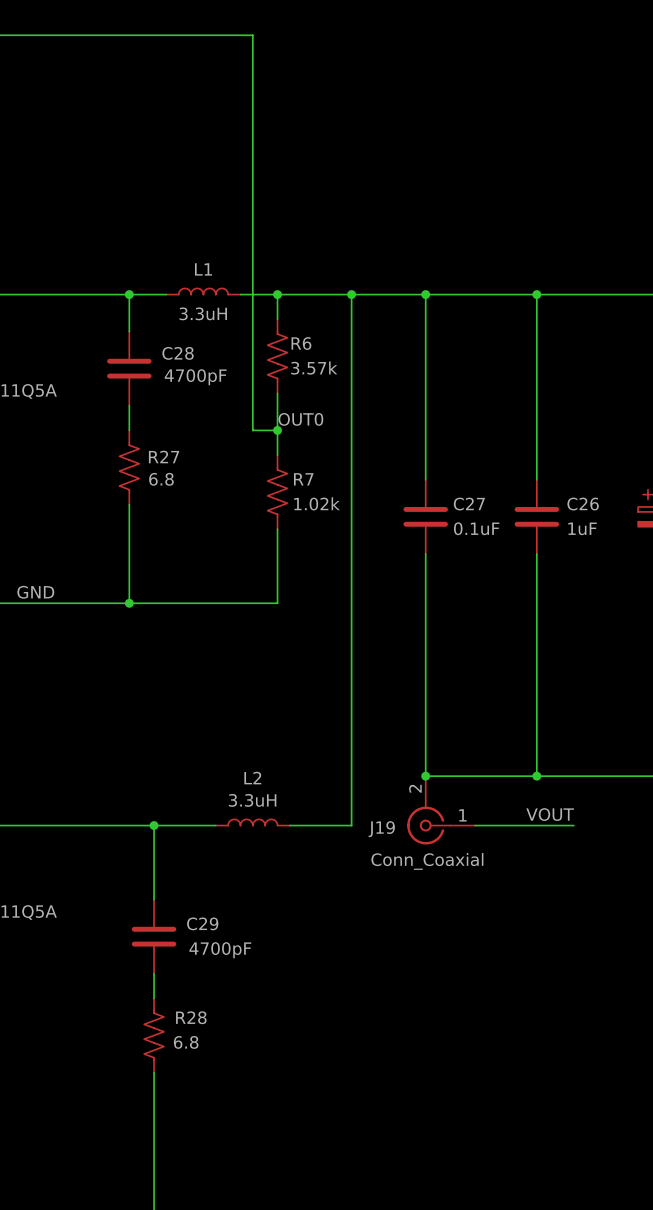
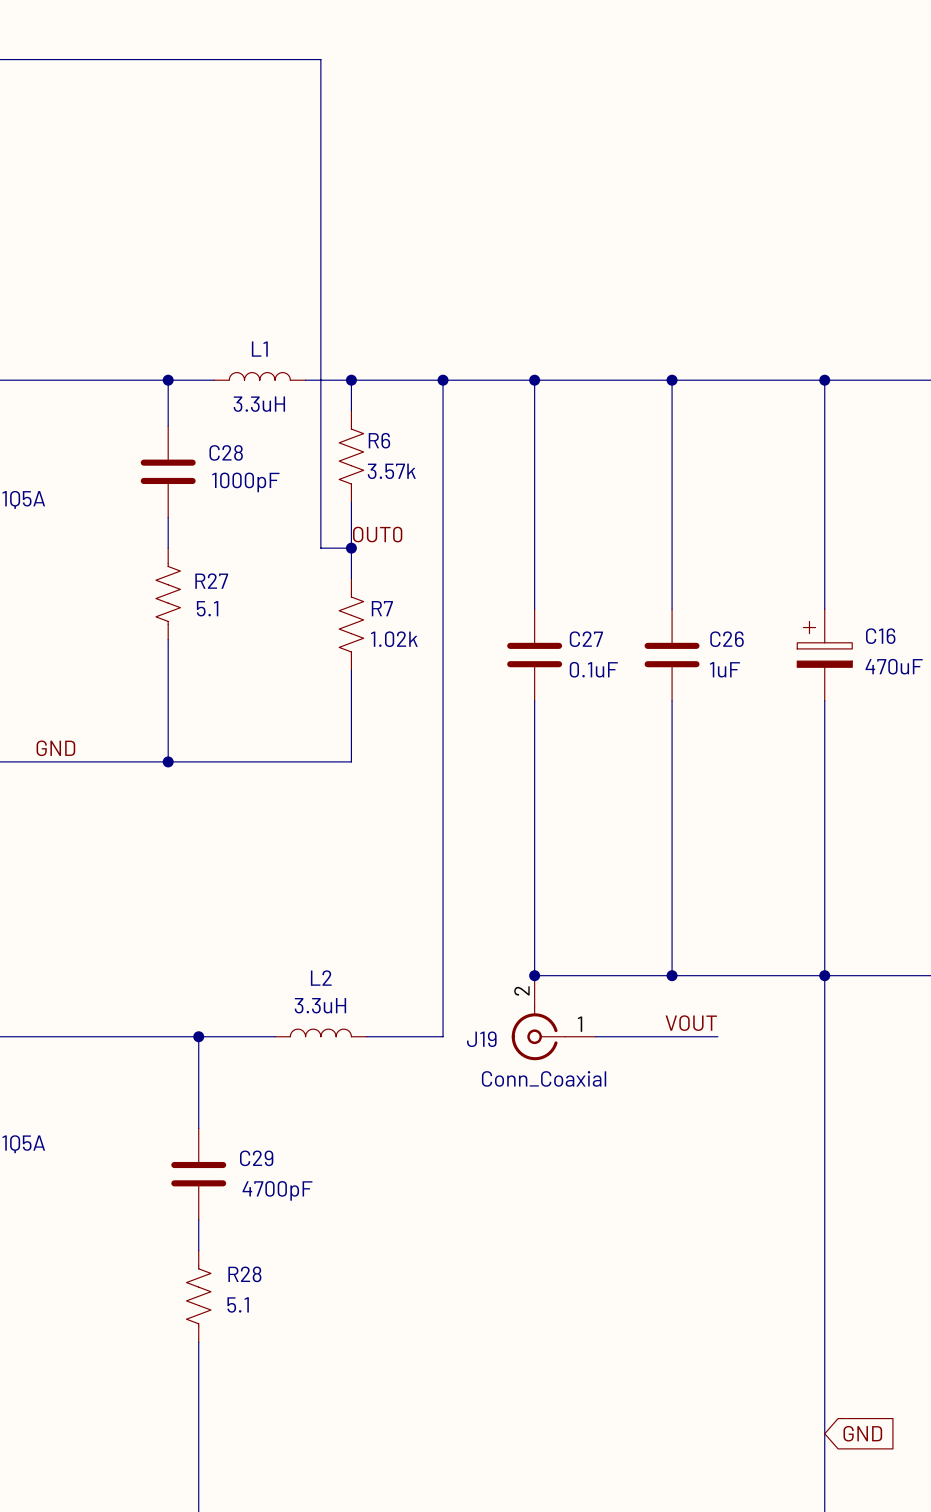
C28 value: 4700pF (195, 377) -> 1000pF (245, 482)
R27 value: 6.8 (161, 479) -> 5.1 (207, 608)
R28 value: 6.8 (186, 1042) -> 5.1 (238, 1304)

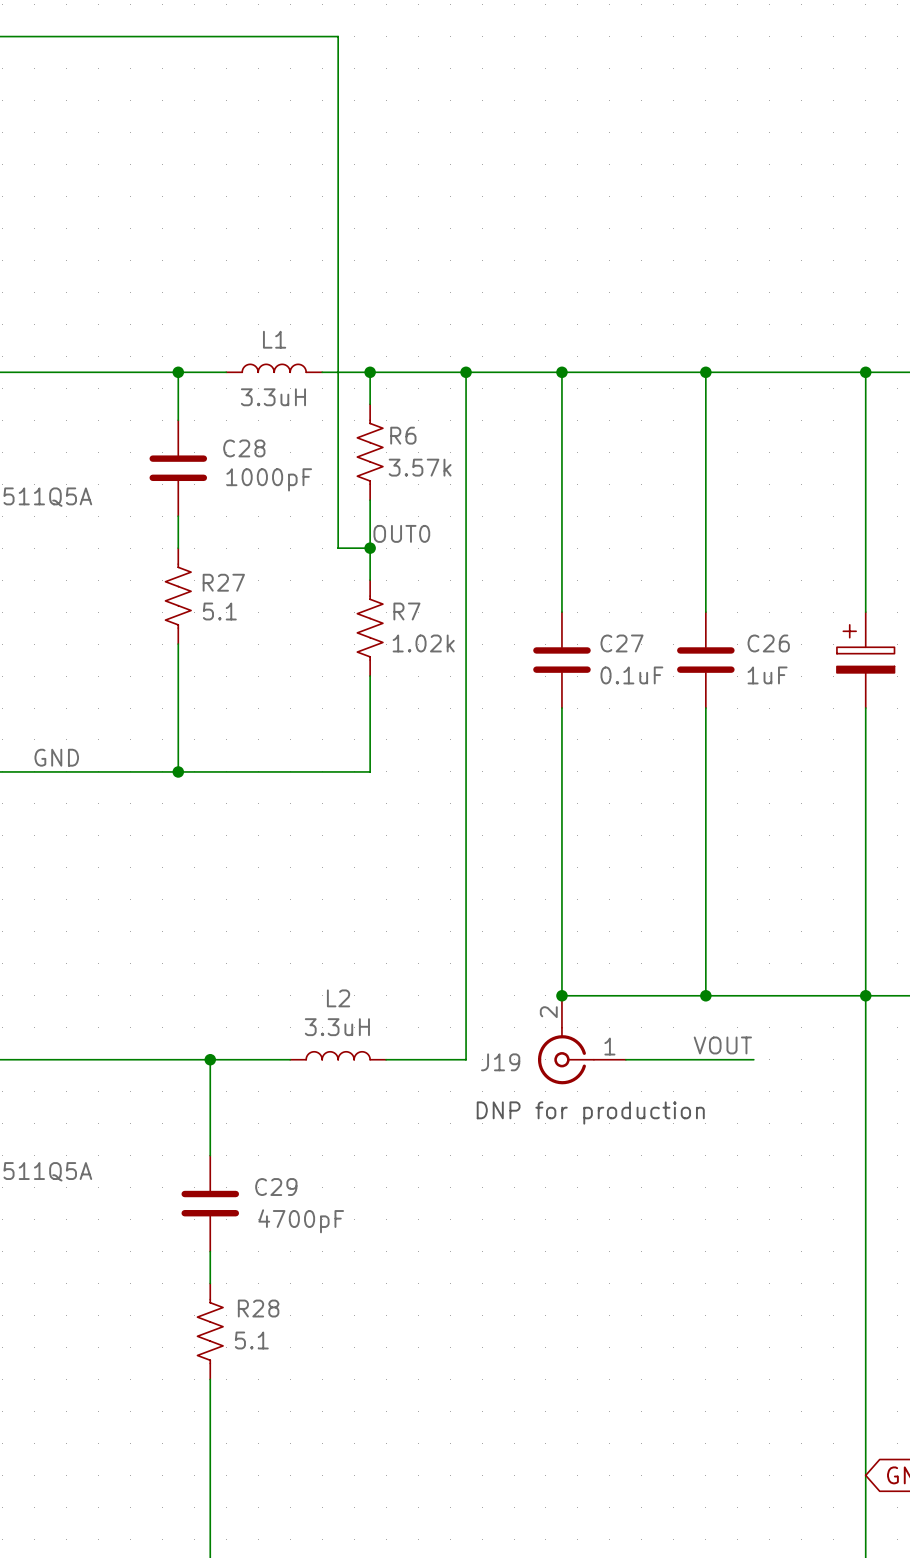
J19 value: Conn_Coaxial (544, 1078) -> none
text: none -> DNP for production (590, 1113)

